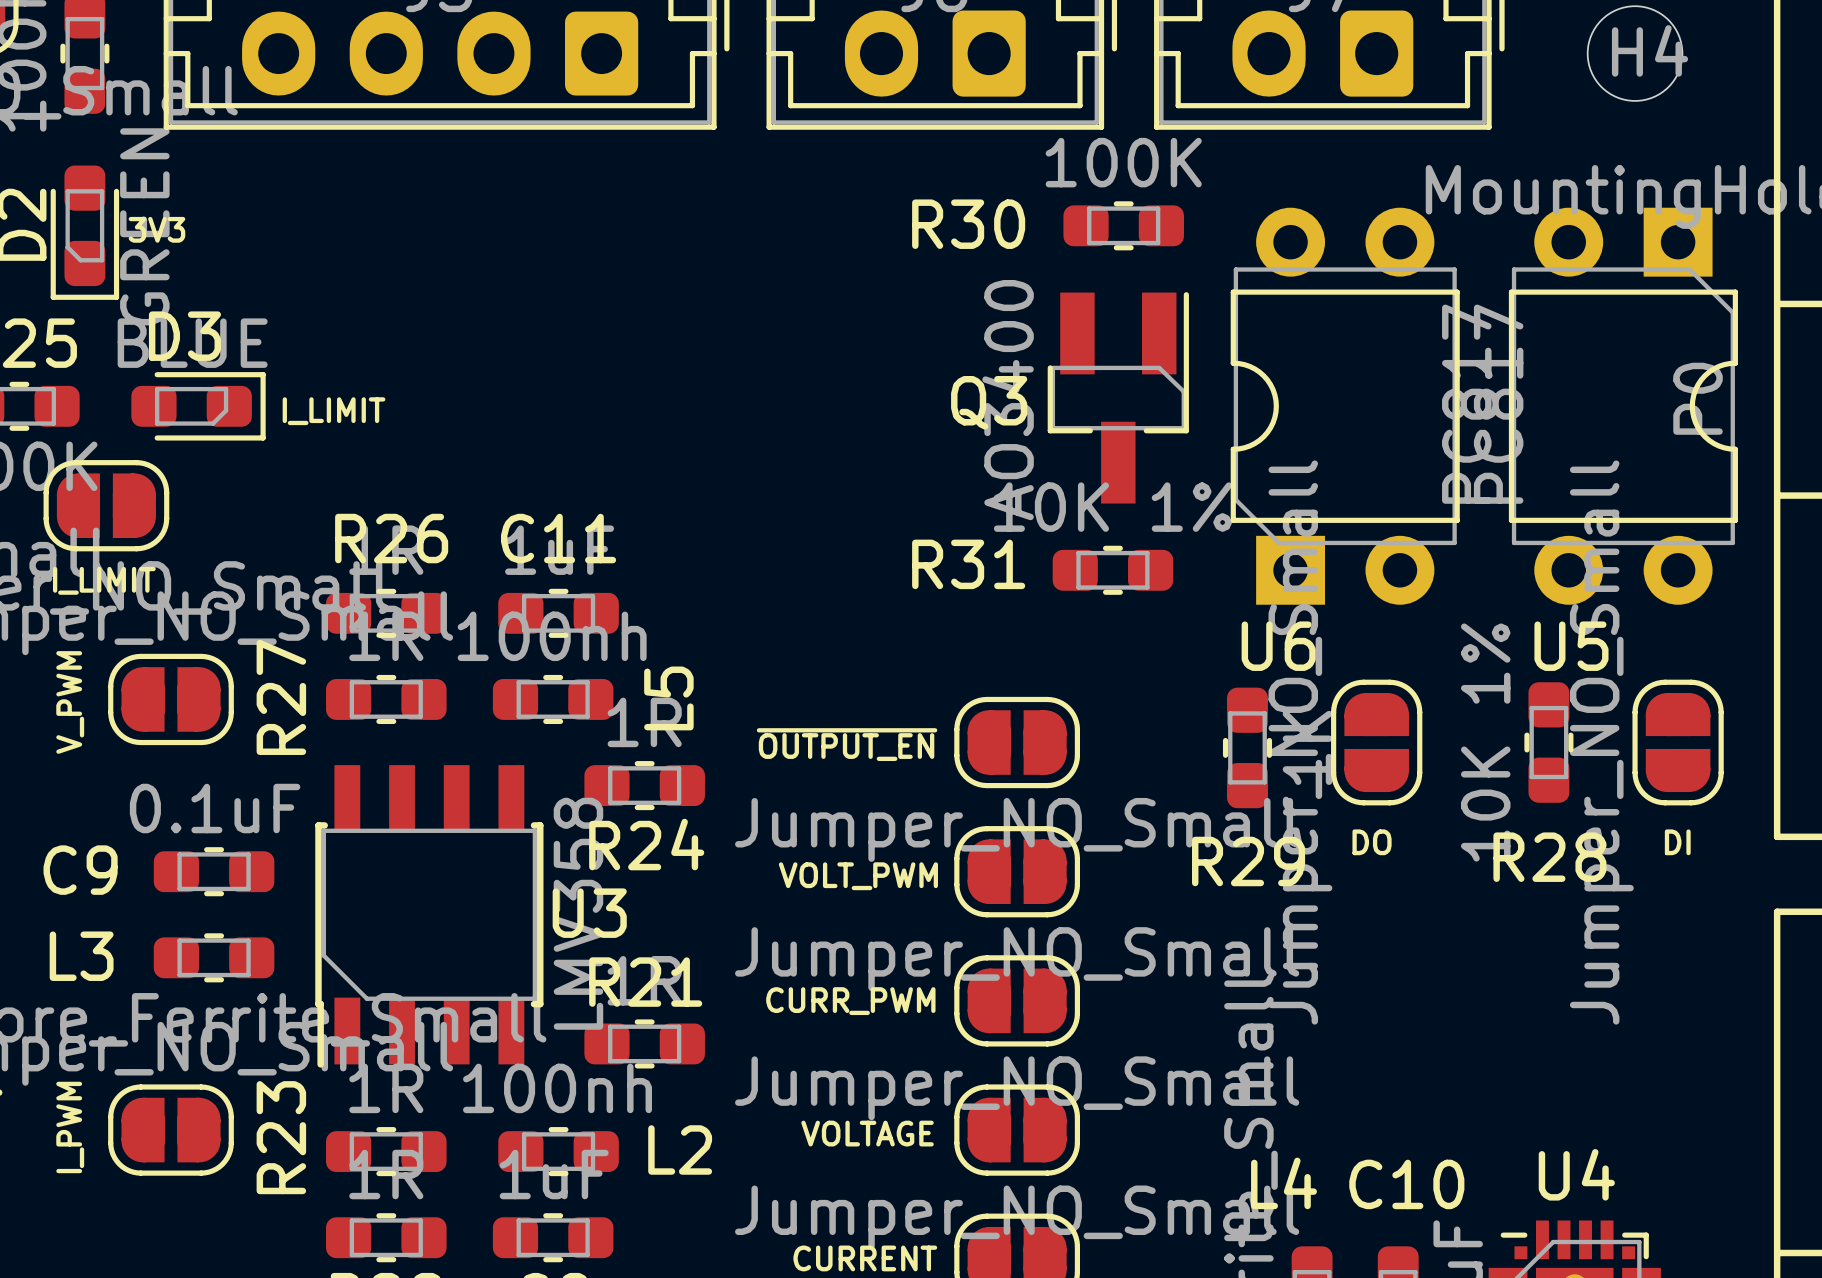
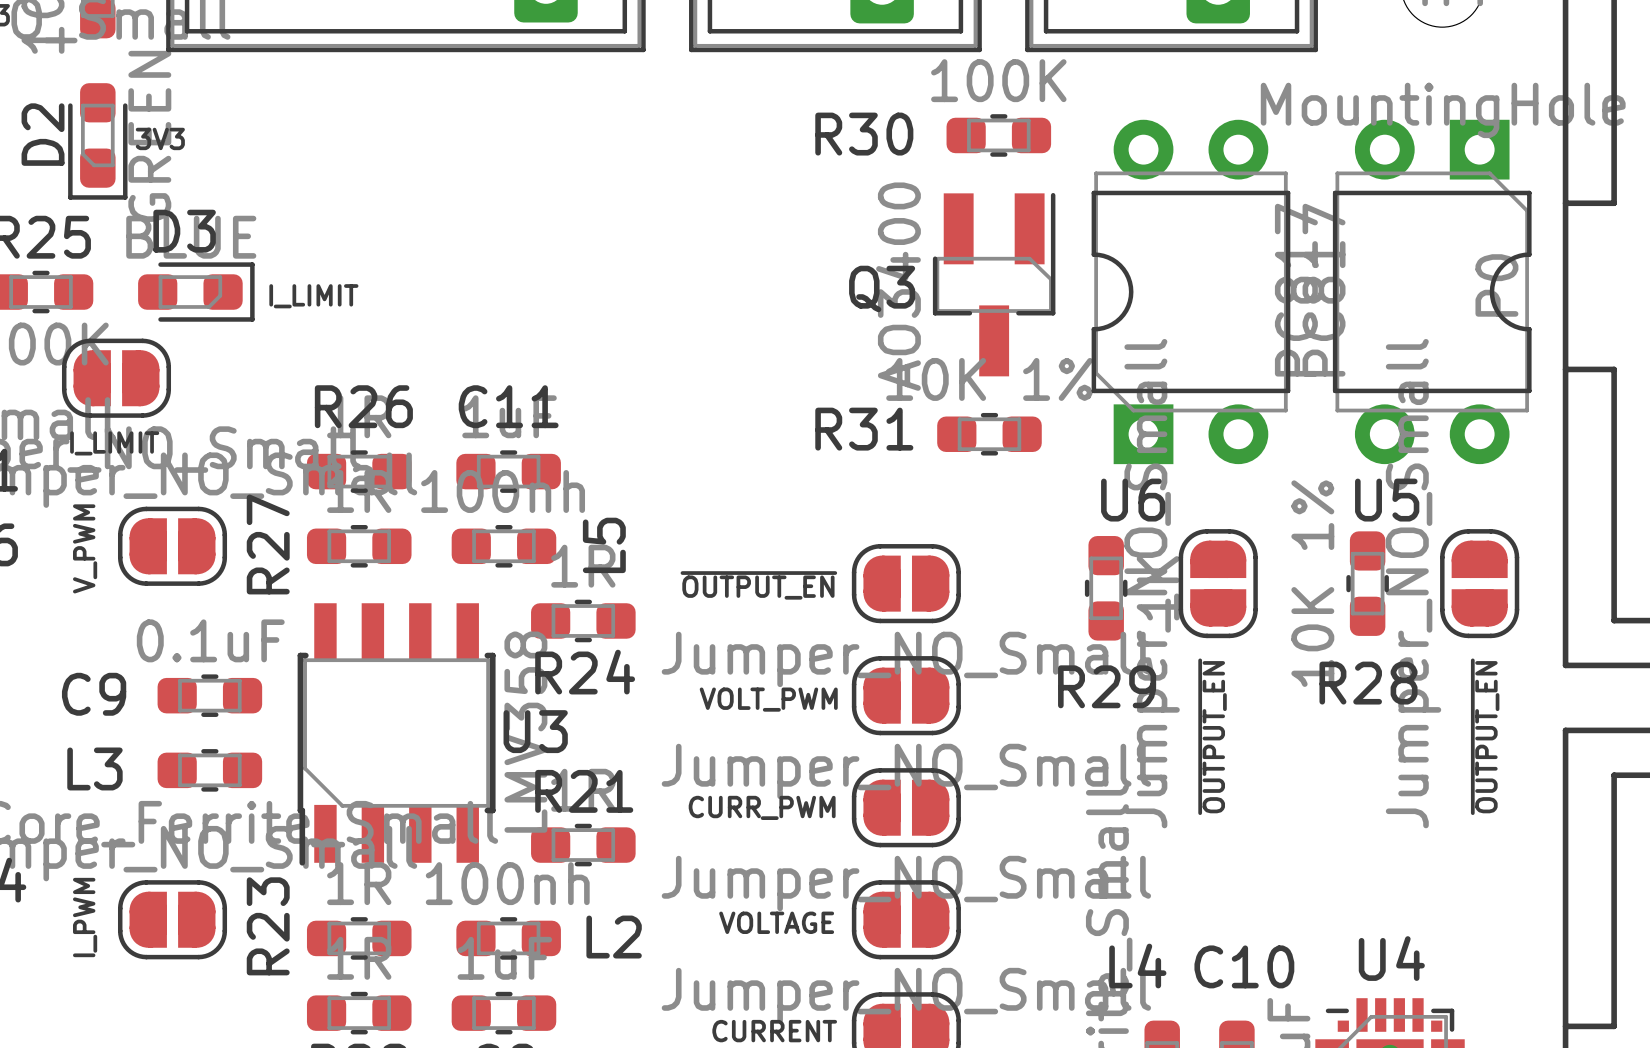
text: DO (1372, 842) -> none
text: DI (1677, 842) -> none
text: none -> ~{OUTPUT_EN} (1212, 736)
text: none -> ~{OUTPUT_EN} (1485, 736)

